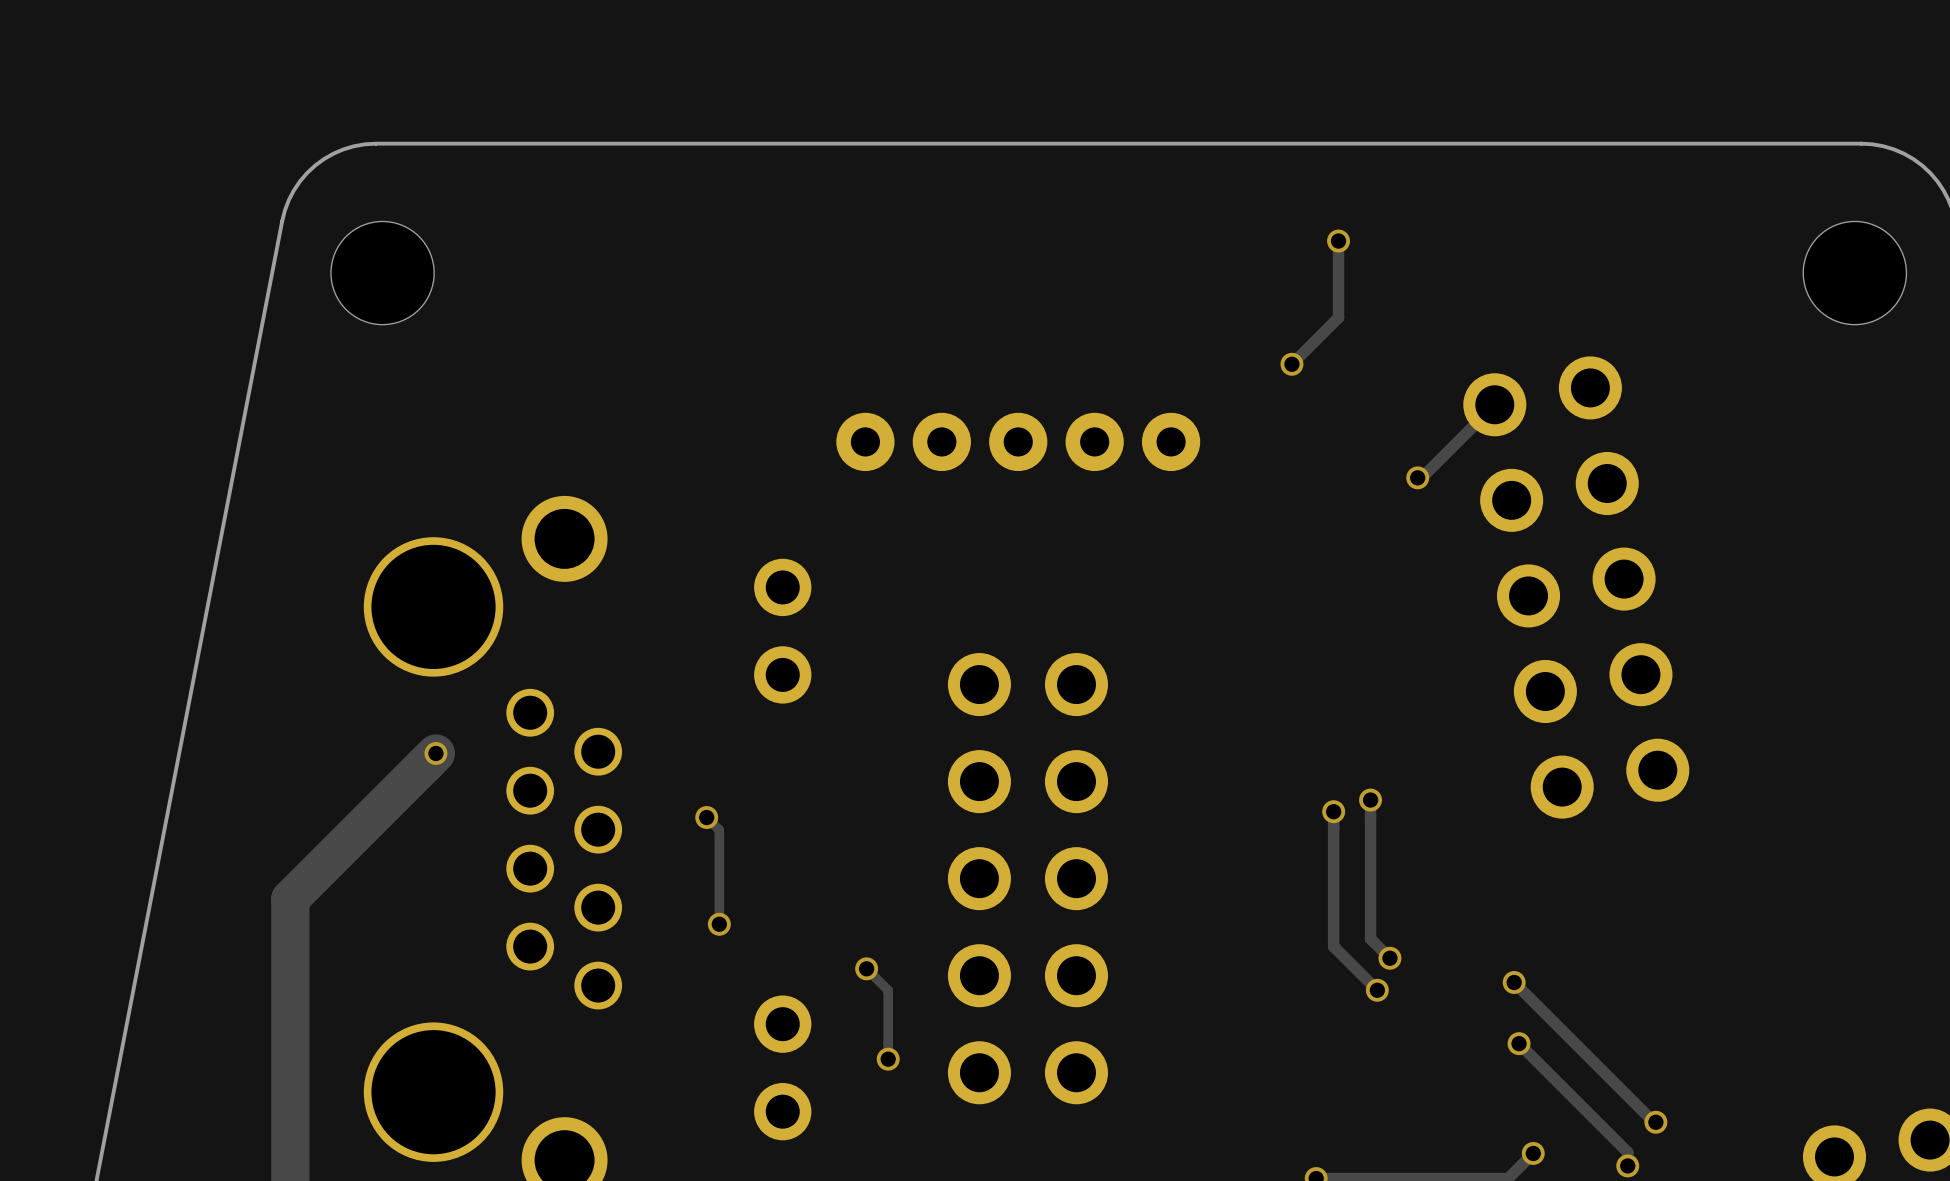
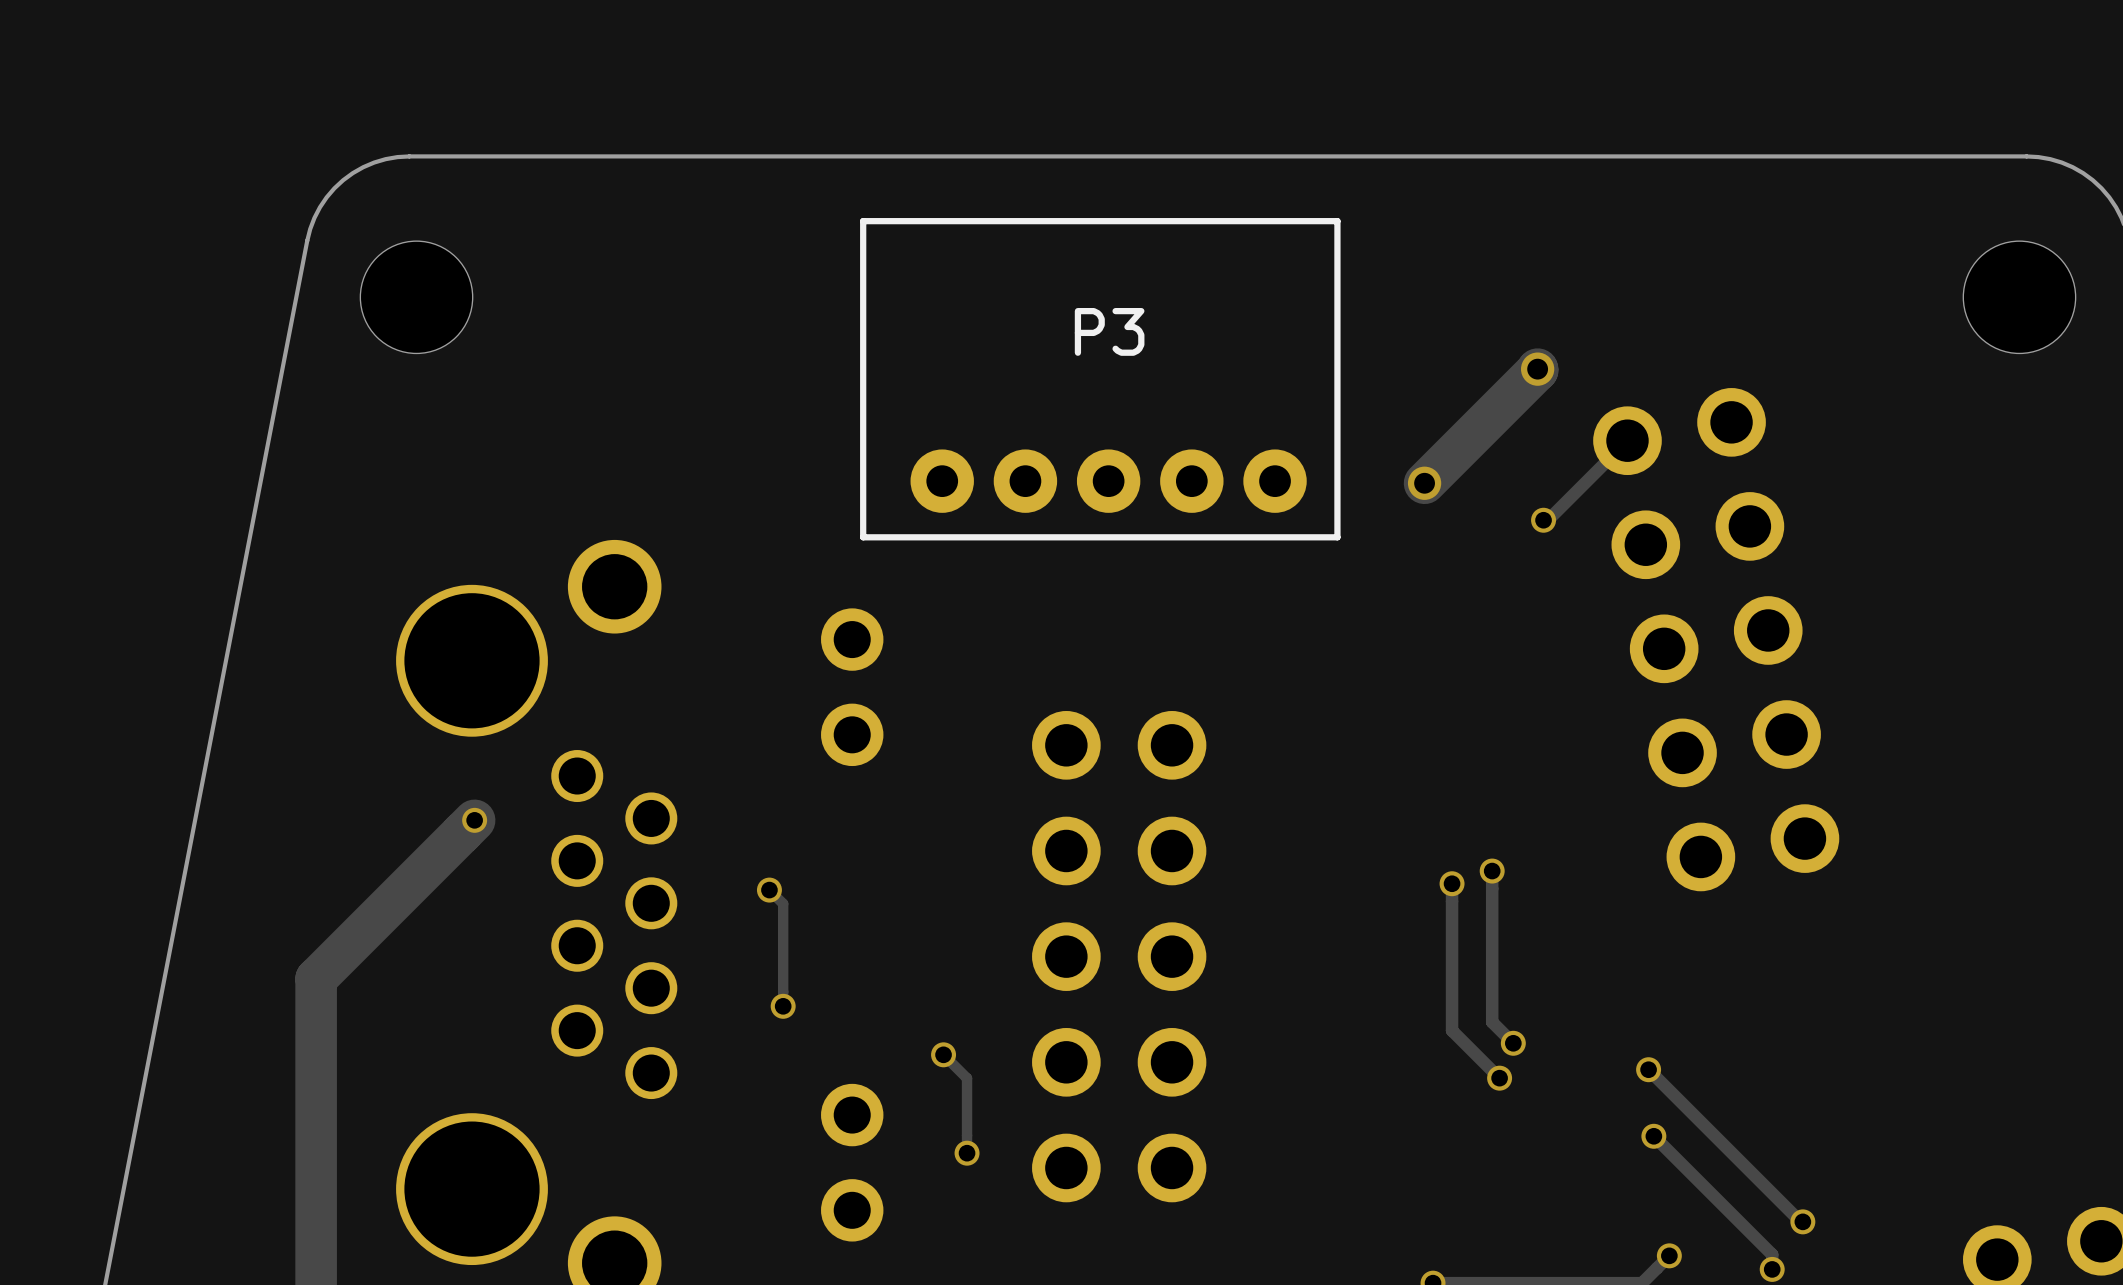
track: (1338, 241) (1338, 317) (1291, 364) -> none
via: (1338, 241) -> none
track: none -> (1537, 369) (1424, 483)
via: none -> (1537, 369)
via: (1291, 364) -> none
P3 side: top (1018, 441) -> bottom (1100, 379)
via: none -> (1424, 483)

